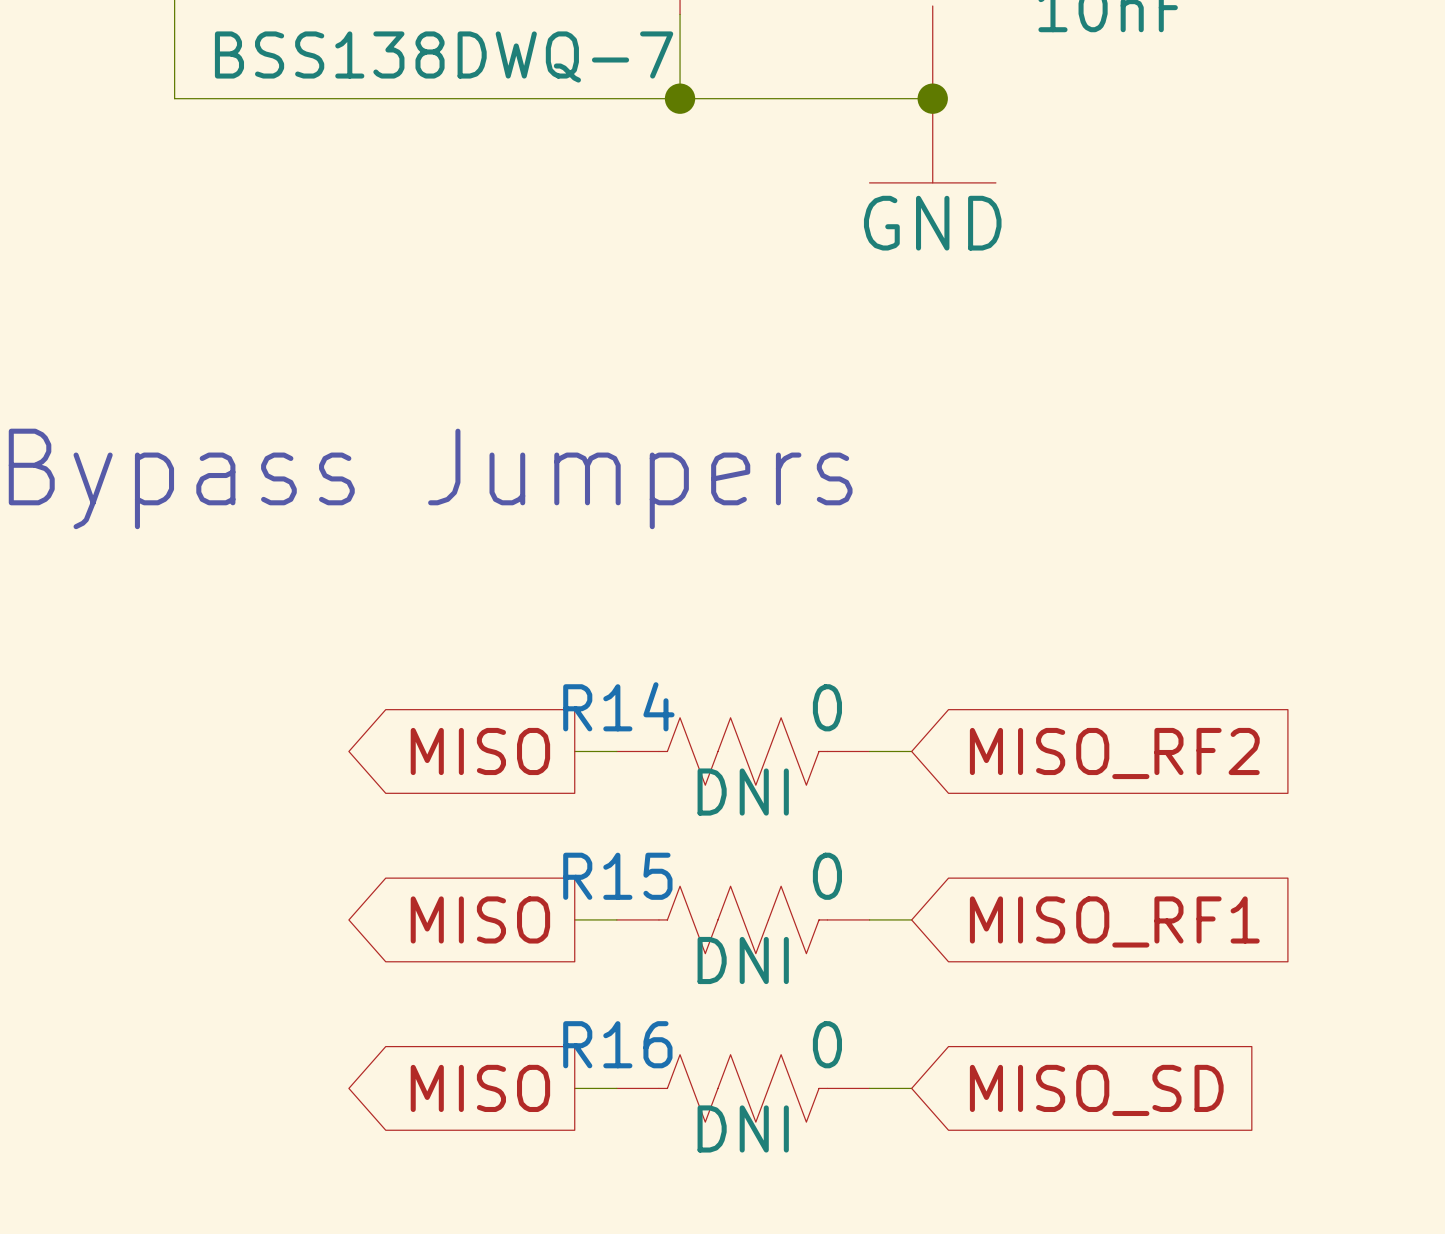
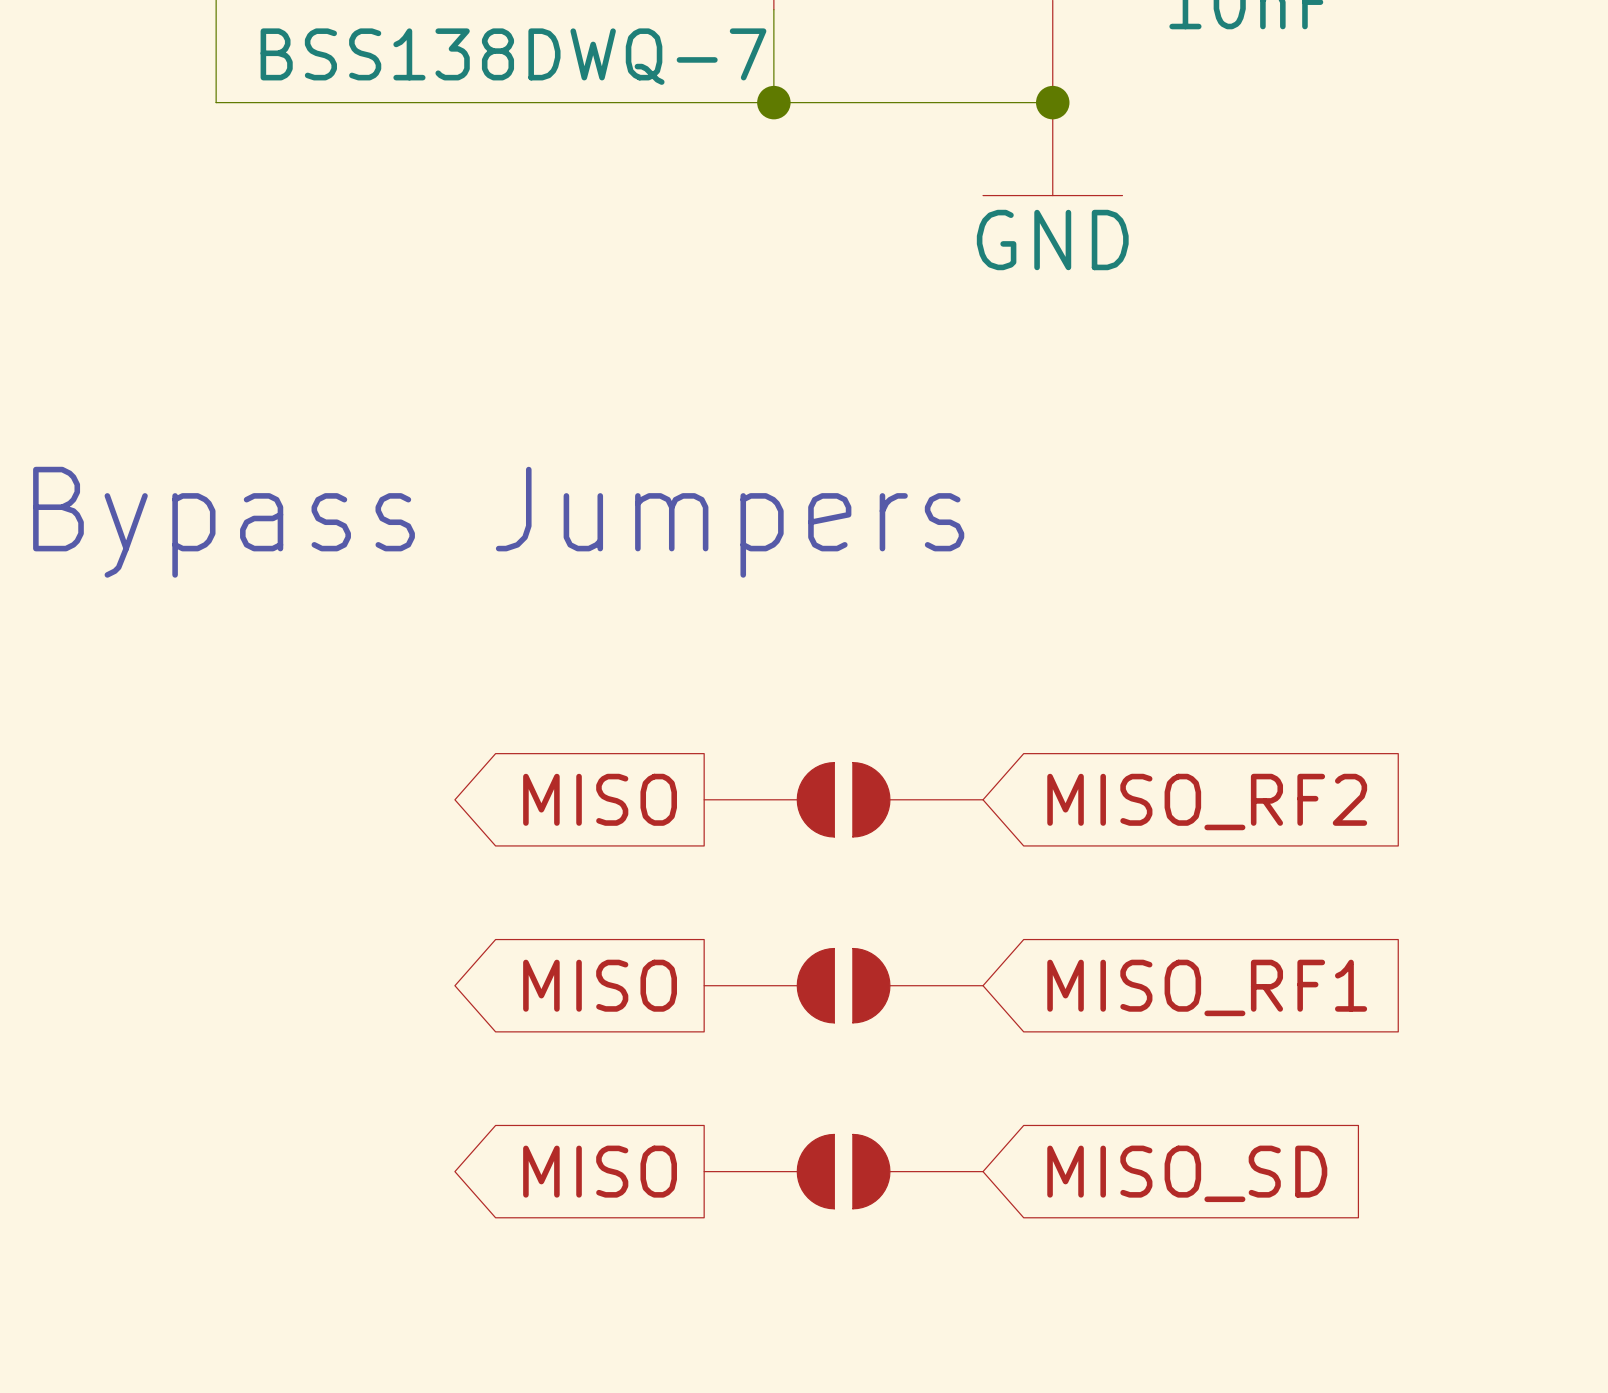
part: none -> (843, 799)
global label position: MISO (480, 751) -> MISO (600, 799)
wire: (574, 751) (616, 751) -> none
R14: 0 (743, 751) -> none
wire: (869, 751) (911, 751) -> none
global label position: MISO_RF2 (1114, 753) -> MISO_RF2 (1207, 802)
part: none -> (843, 985)
global label position: MISO (480, 919) -> MISO (600, 985)
wire: (574, 919) (616, 919) -> none
R15: 0 (743, 919) -> none
wire: (869, 919) (911, 919) -> none
global label position: MISO_RF1 (1114, 921) -> MISO_RF1 (1207, 987)
part: none -> (843, 1171)
global label position: MISO (480, 1088) -> MISO (600, 1171)
wire: (574, 1088) (616, 1088) -> none
R16: 0 (743, 1088) -> none
wire: (869, 1088) (911, 1088) -> none
global label position: MISO_SD (1096, 1090) -> MISO_SD (1187, 1173)

